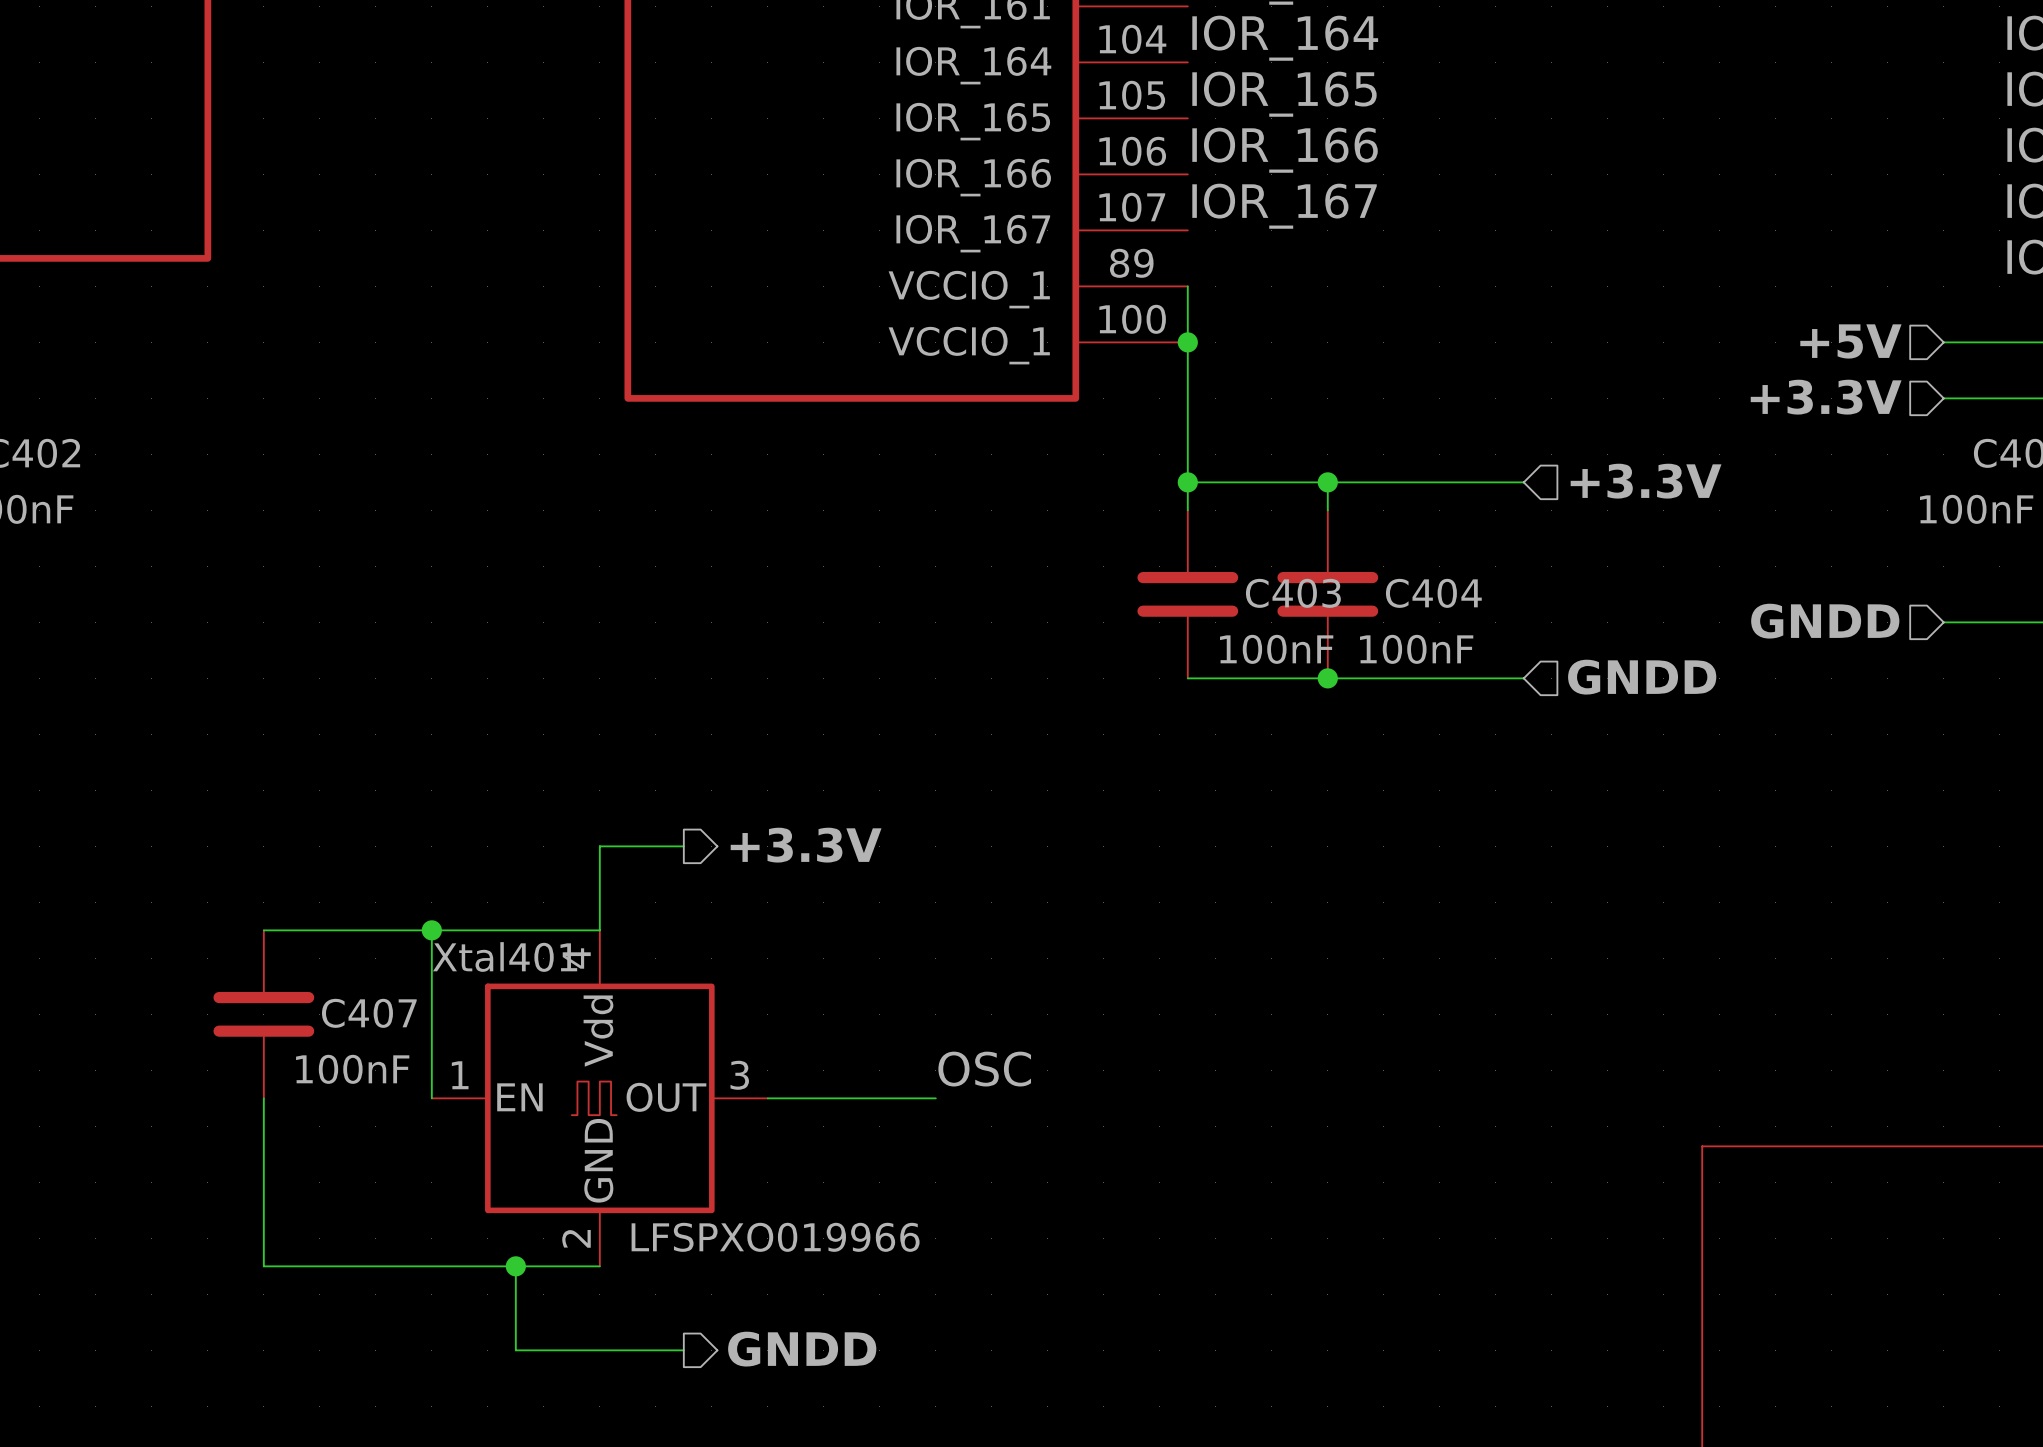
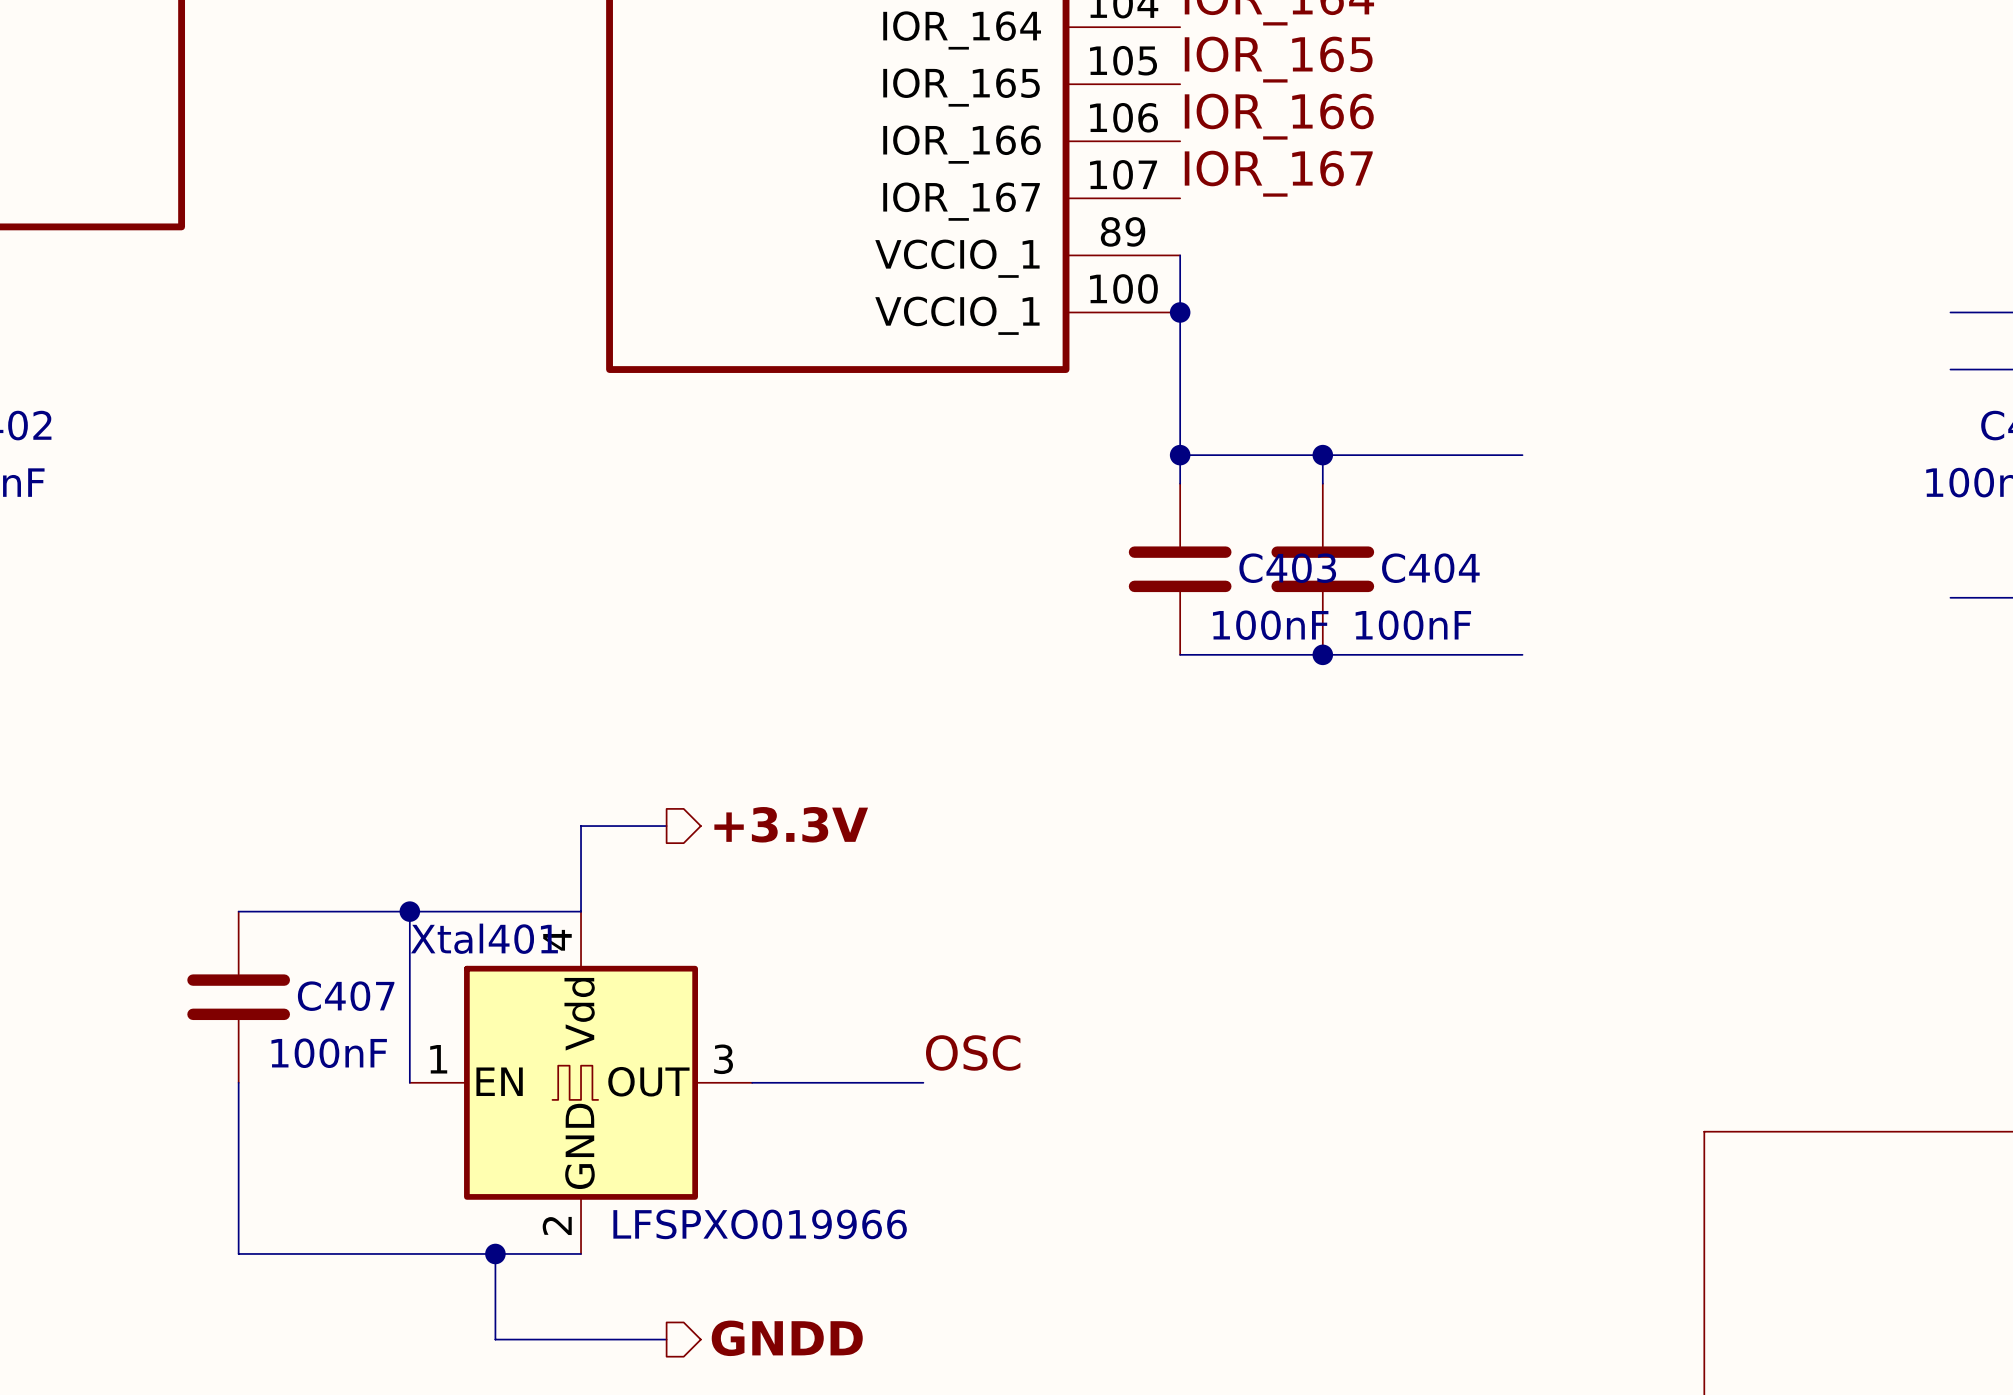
hierarchical label: +5V (1850, 341) -> none
hierarchical label: +3.3V (1826, 397) -> none
hierarchical label: +3.3V (1646, 481) -> none
hierarchical label: GNDD (1825, 621) -> none
hierarchical label: GNDD (1642, 677) -> none

